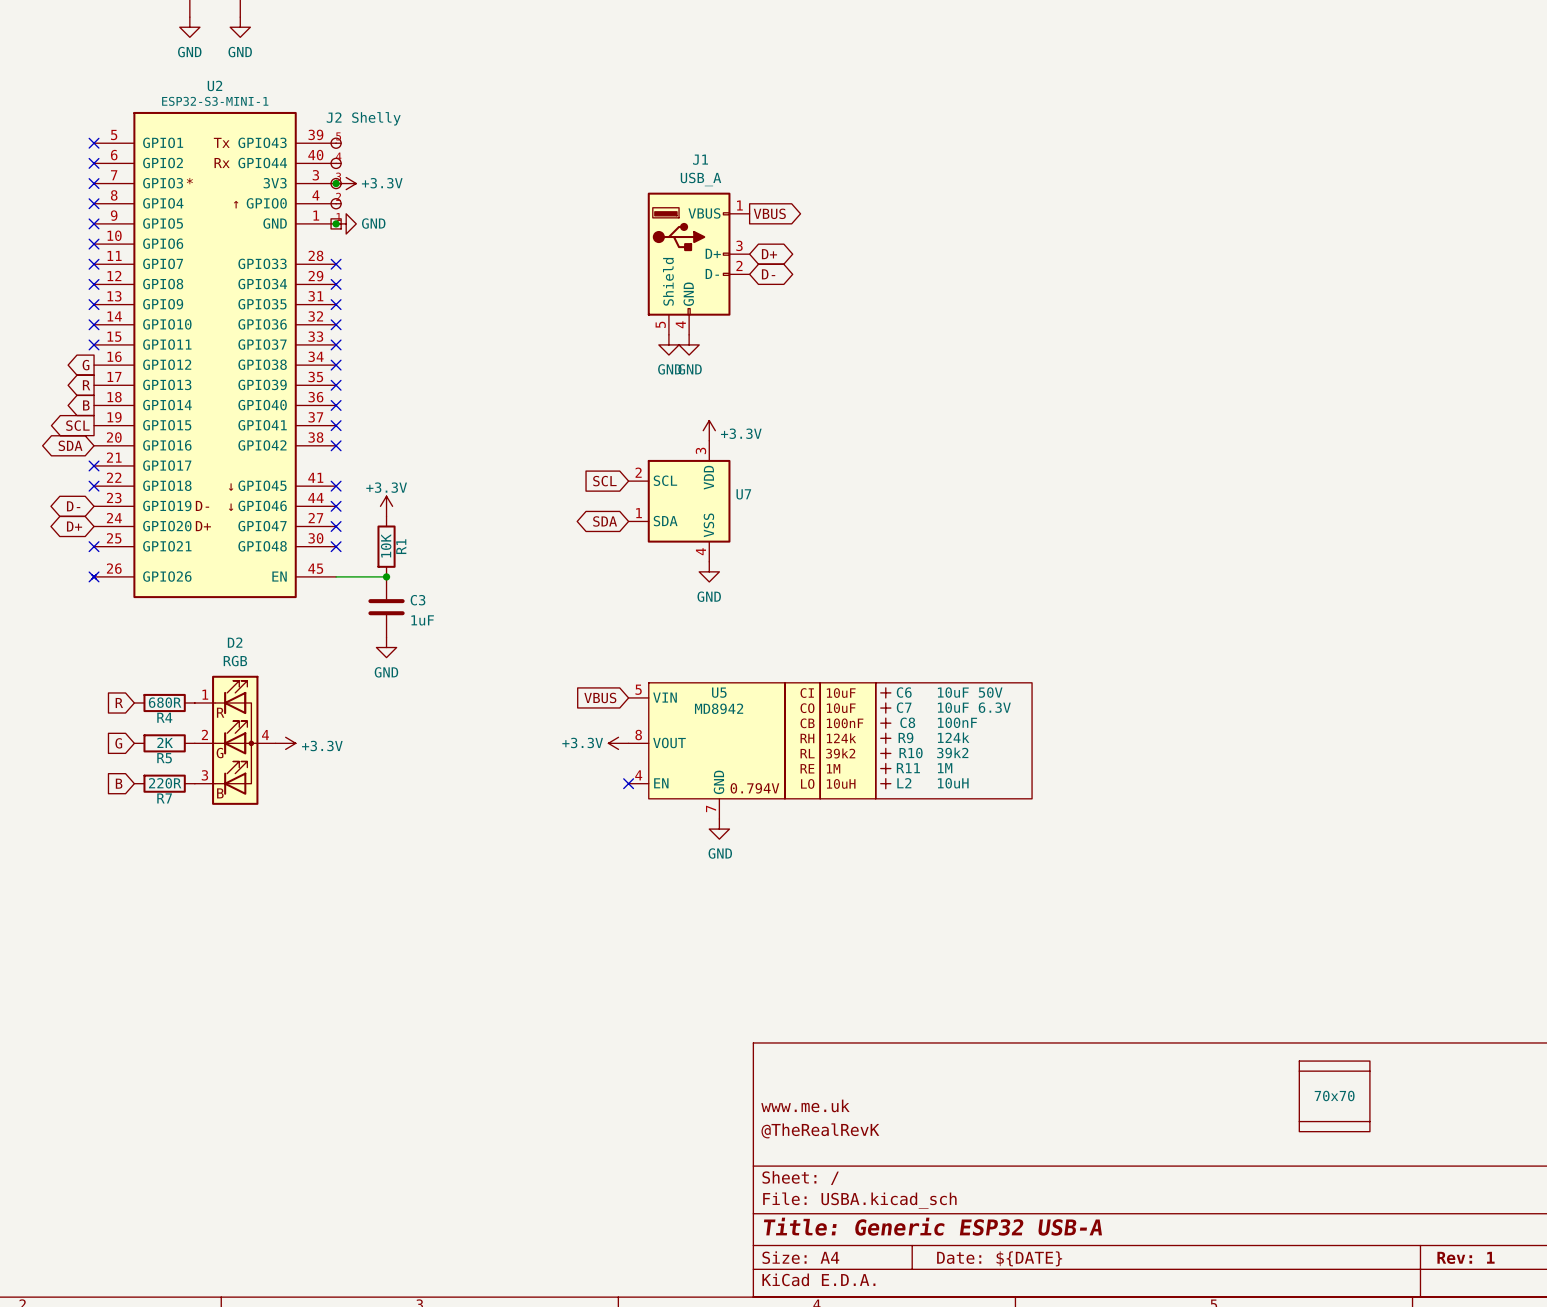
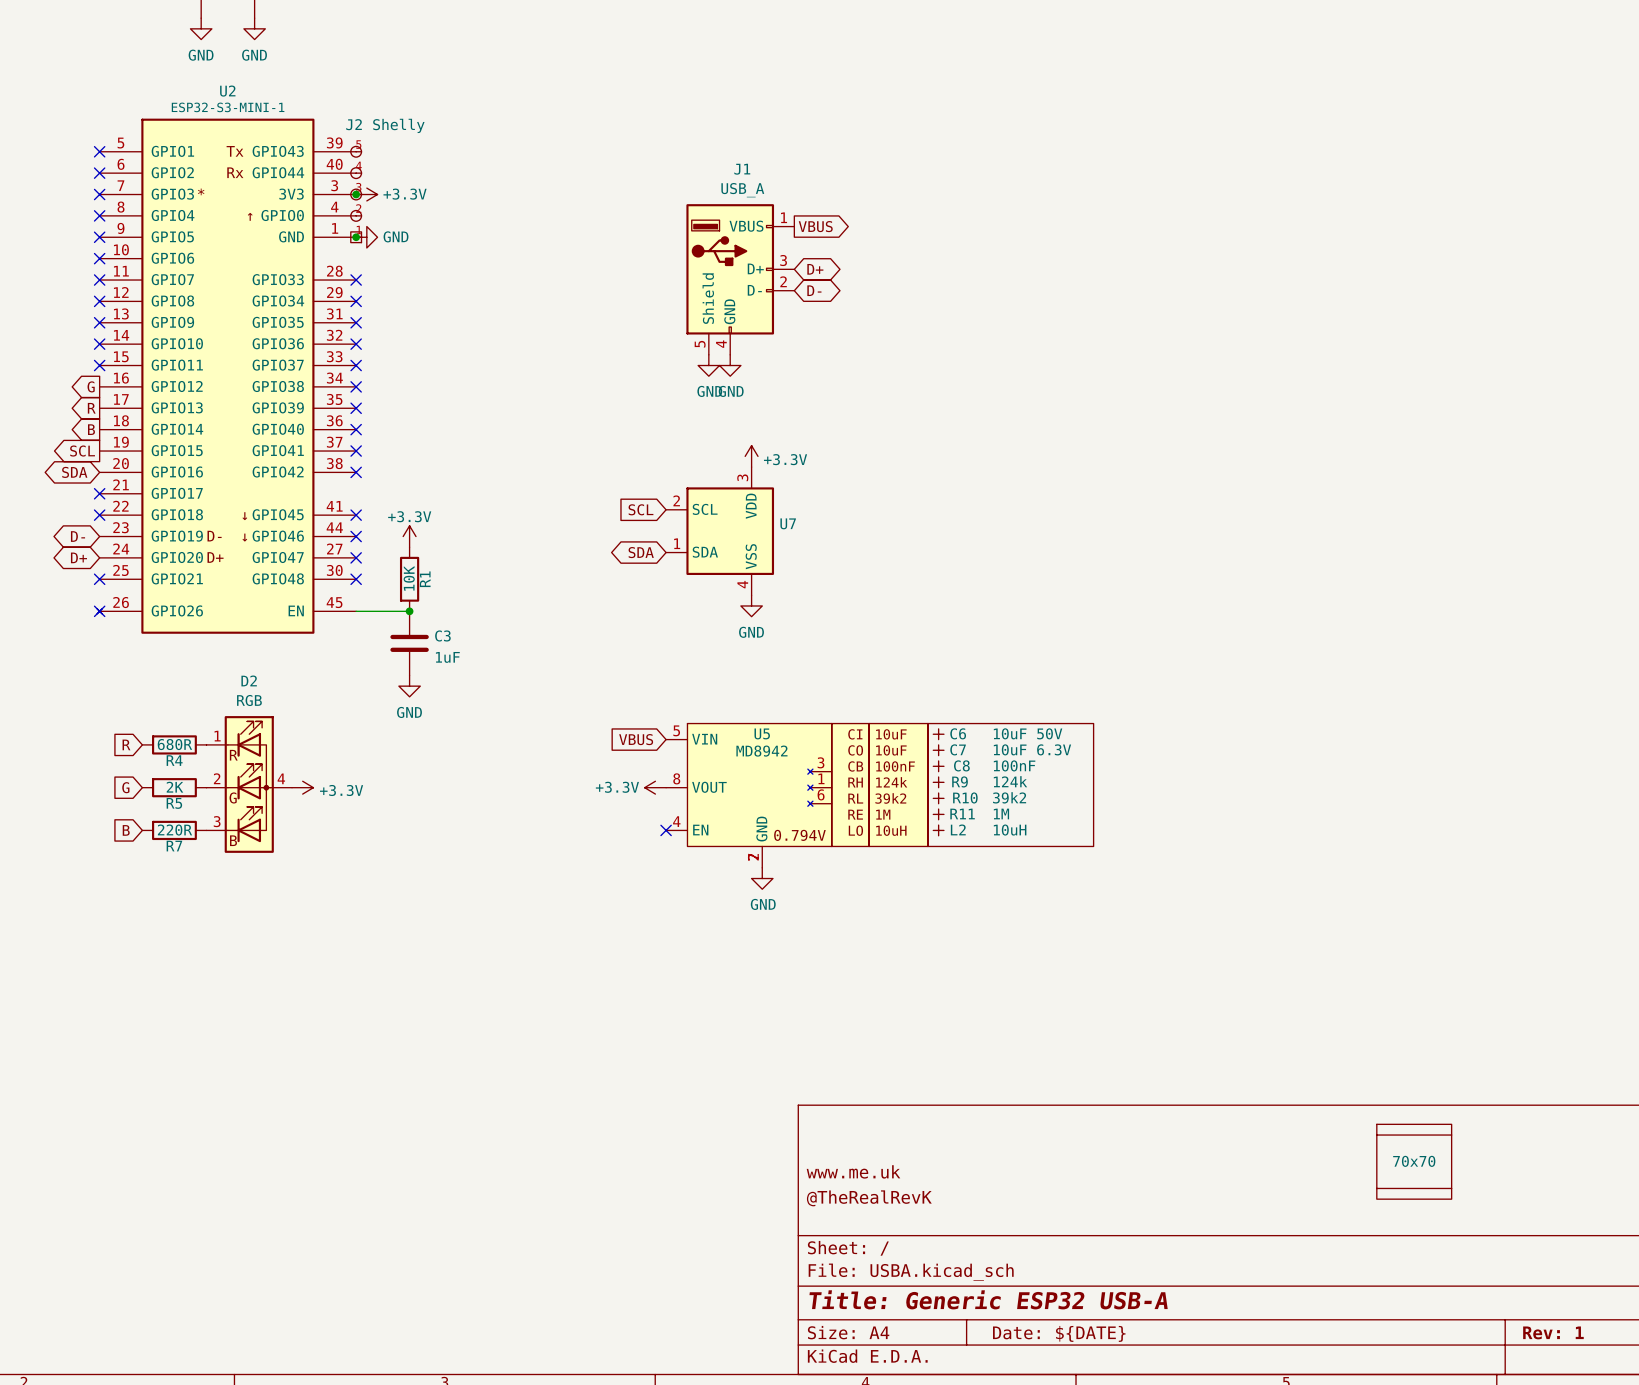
U5 symbol: [628, 682, 1033, 819] -> [666, 723, 1094, 868]

